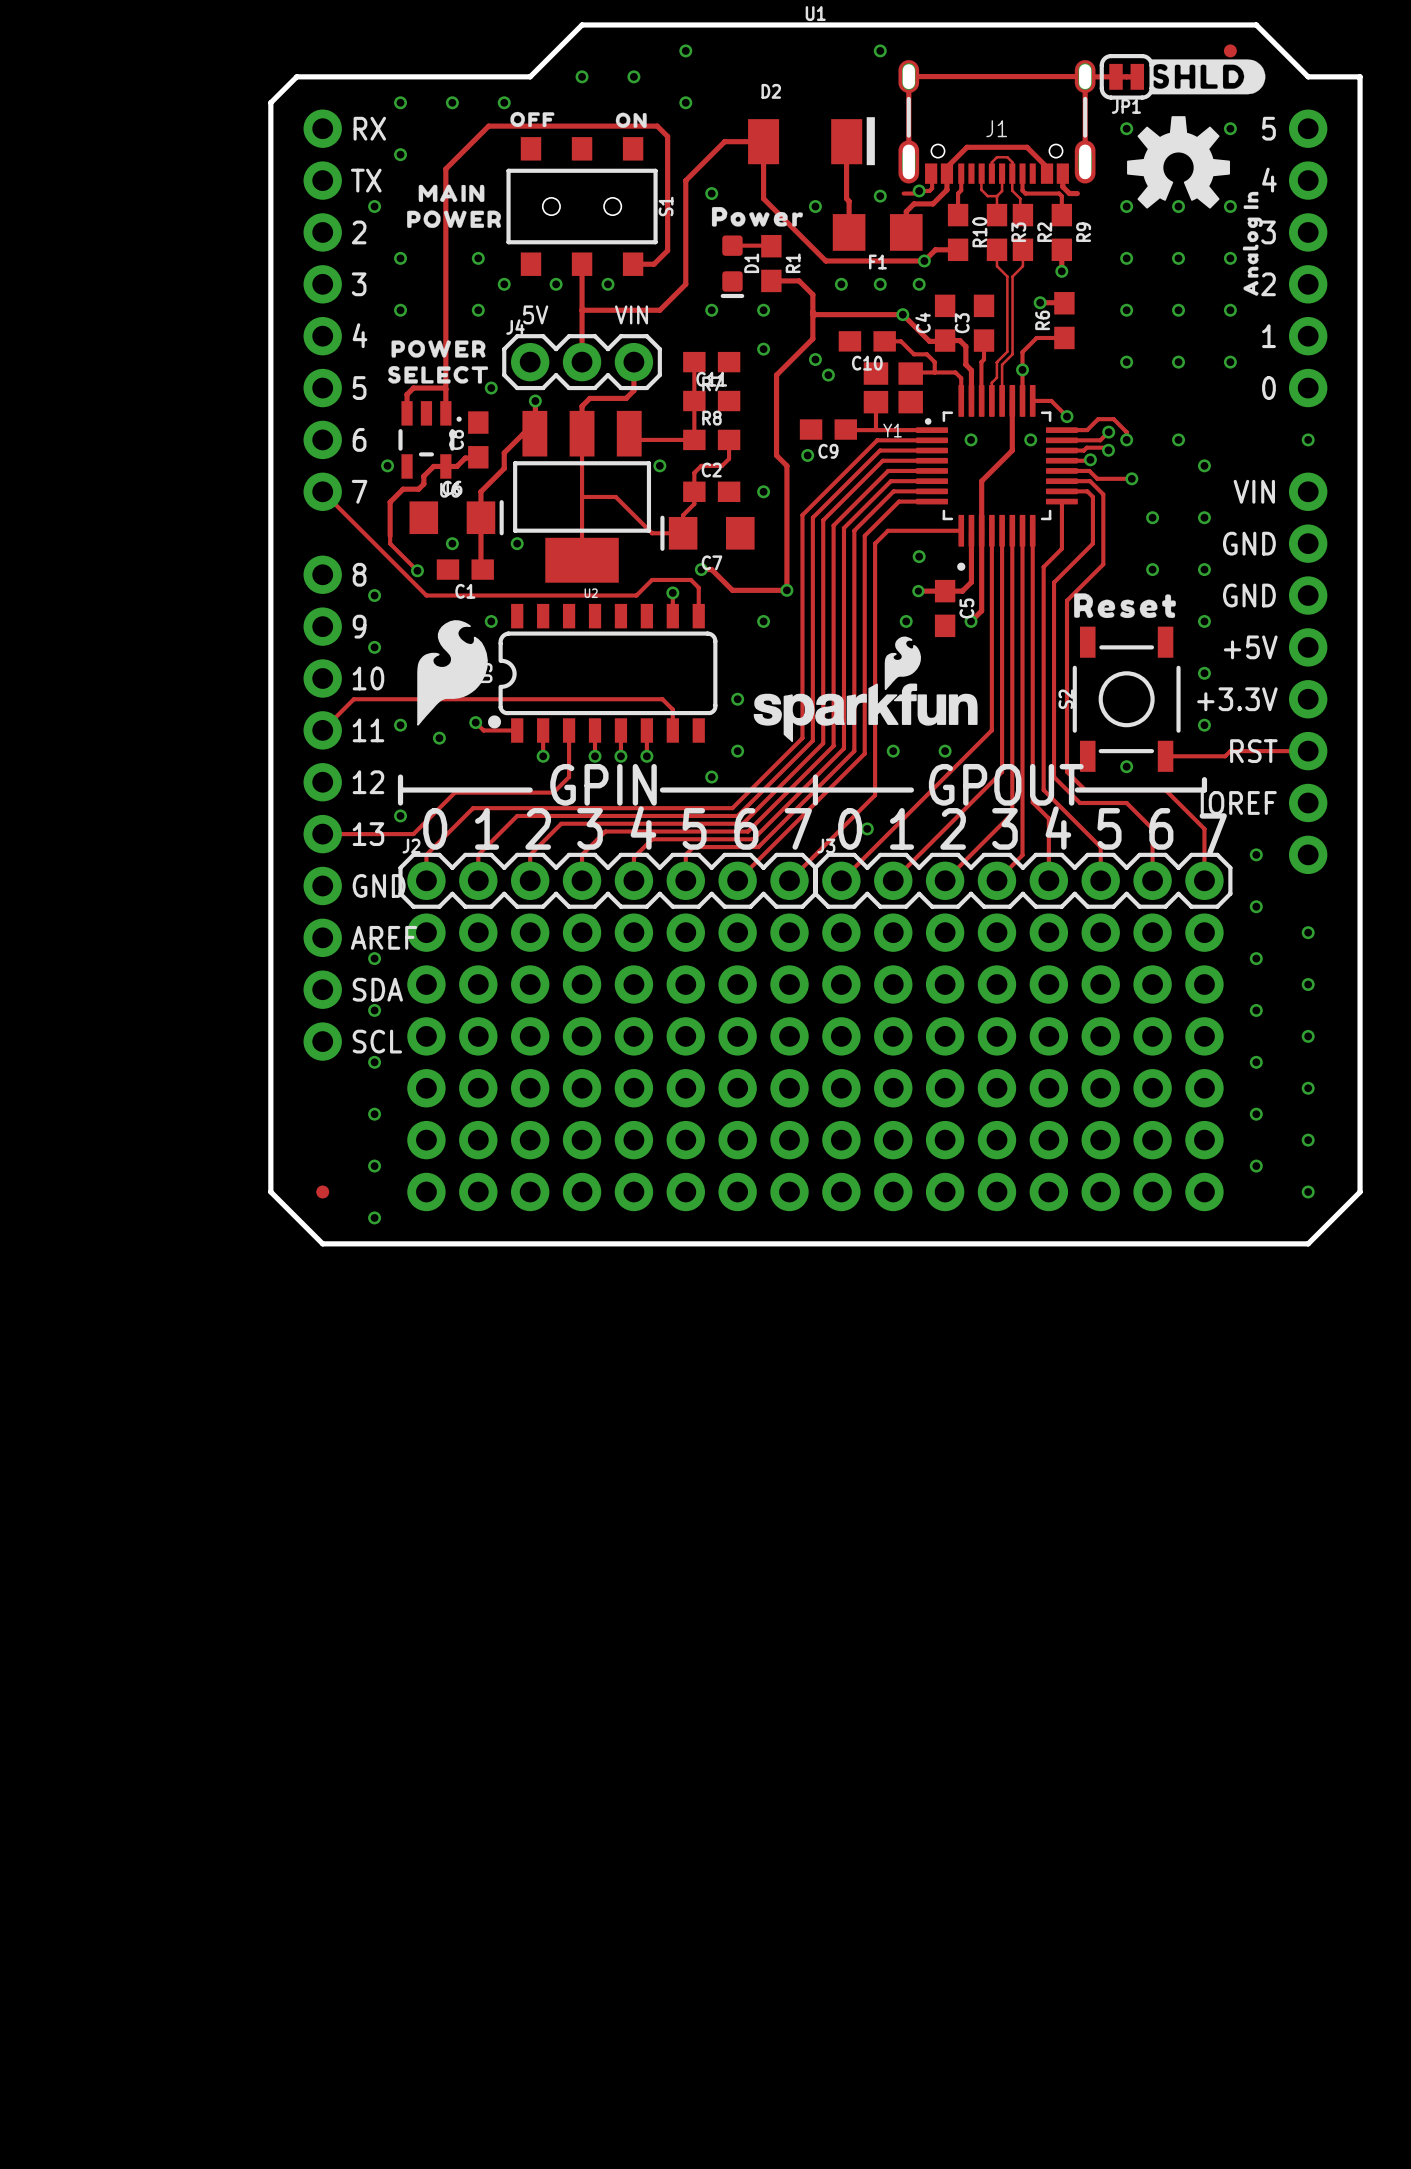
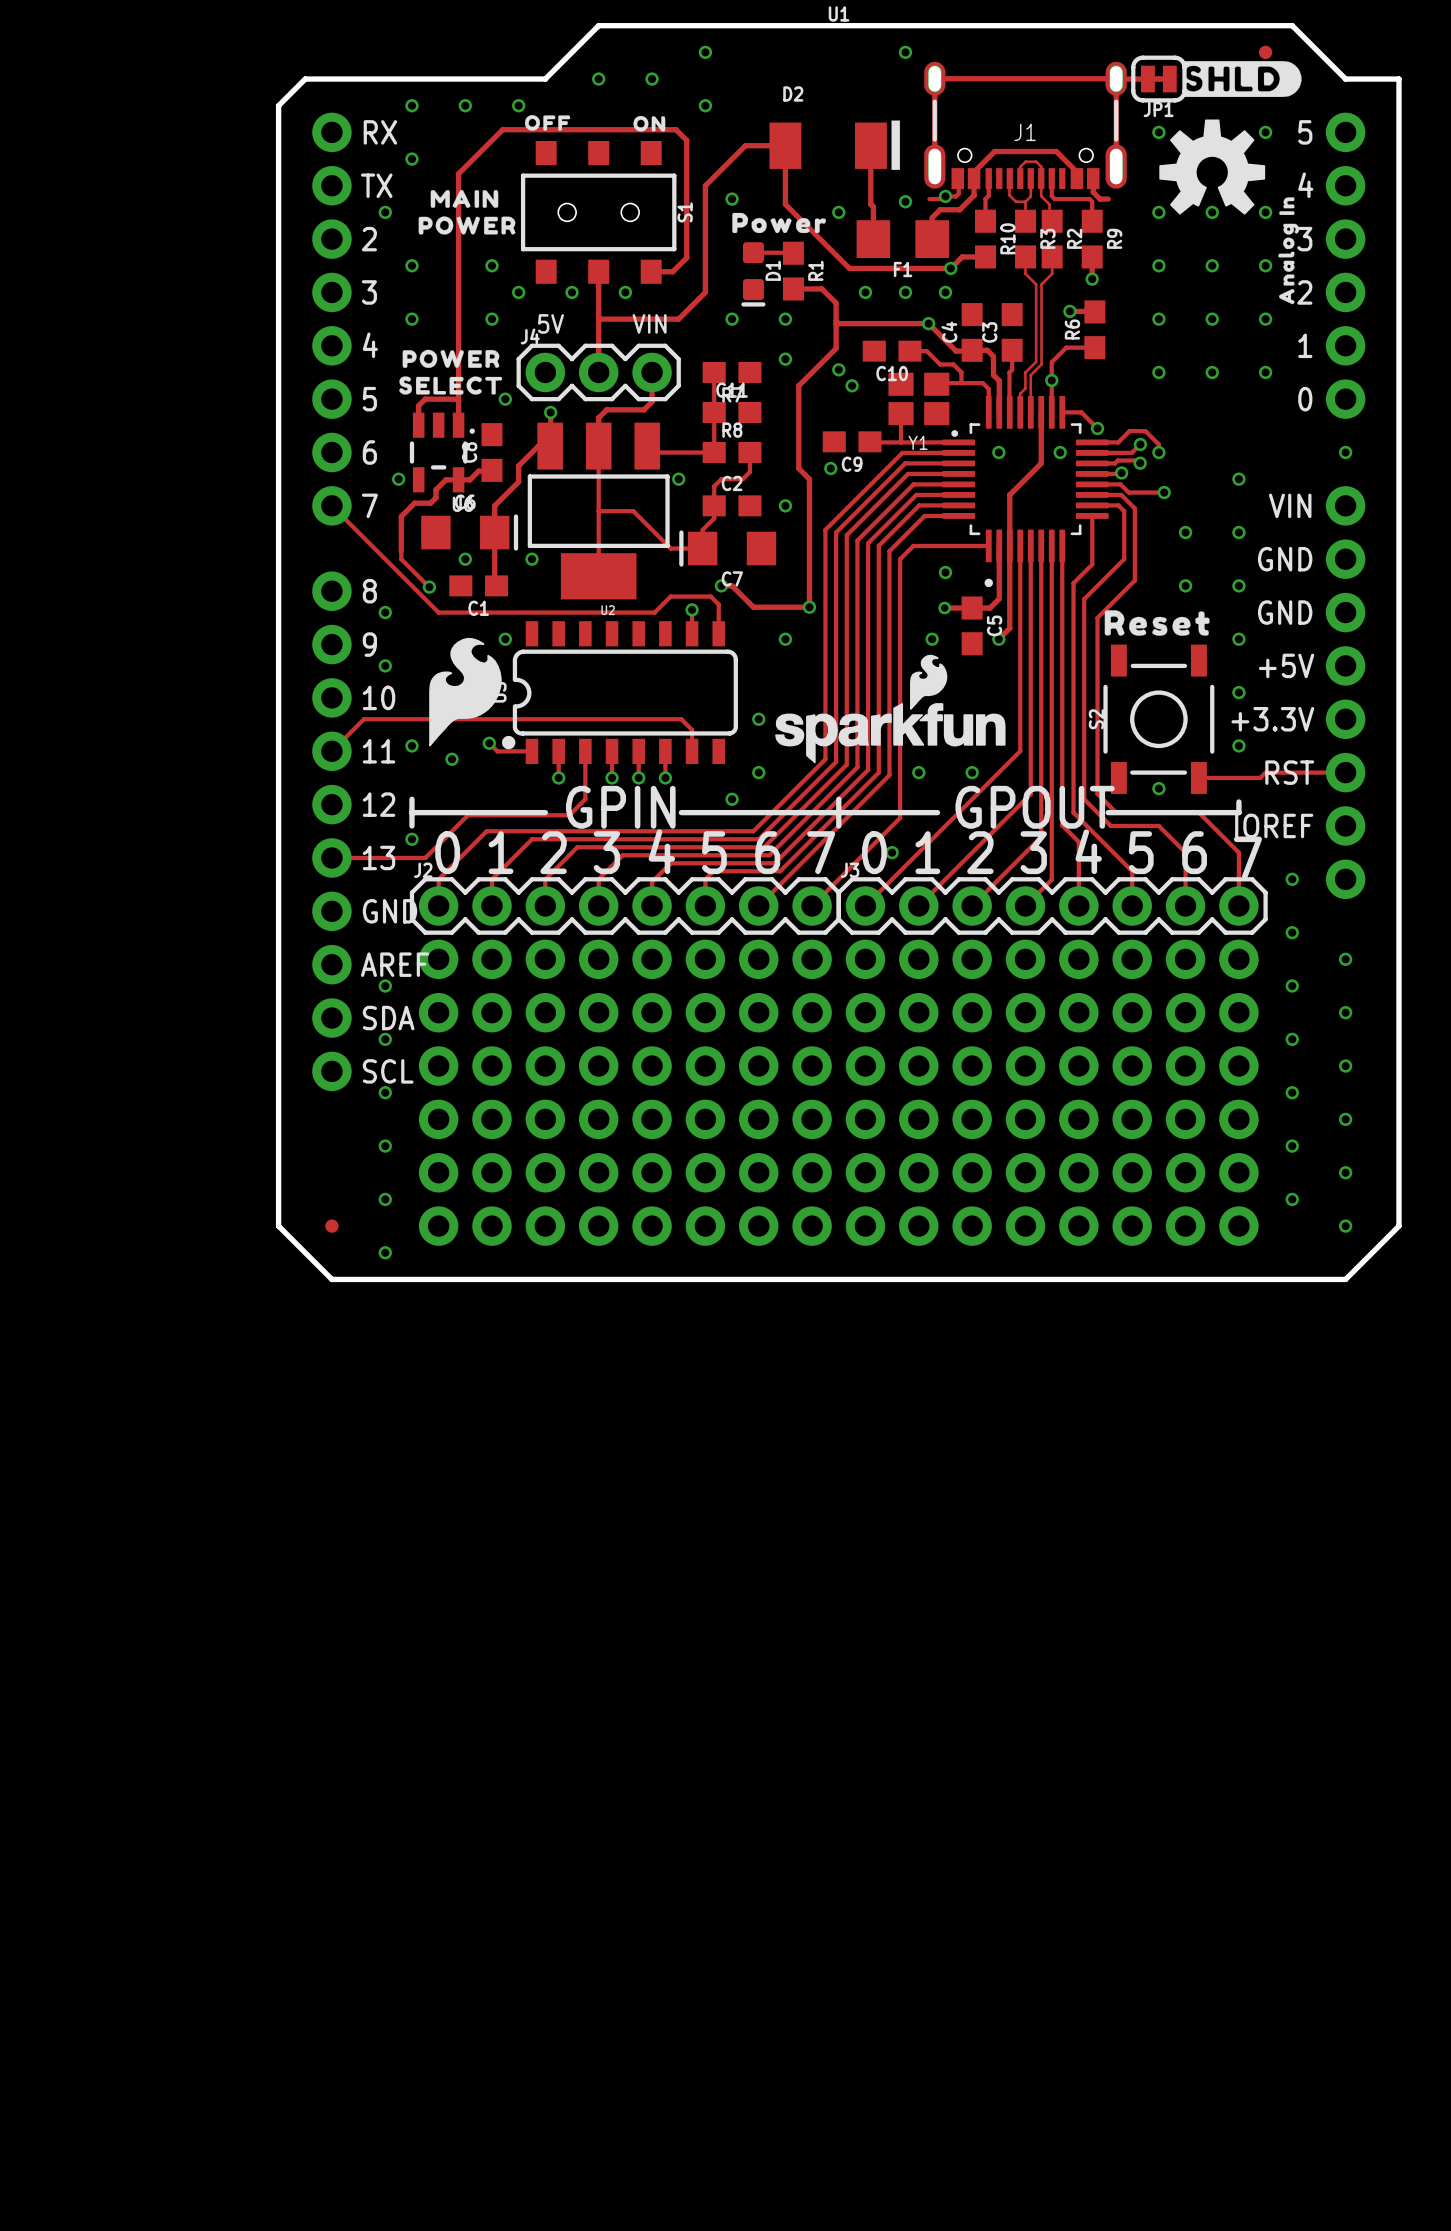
via: (1178, 439) -> none

